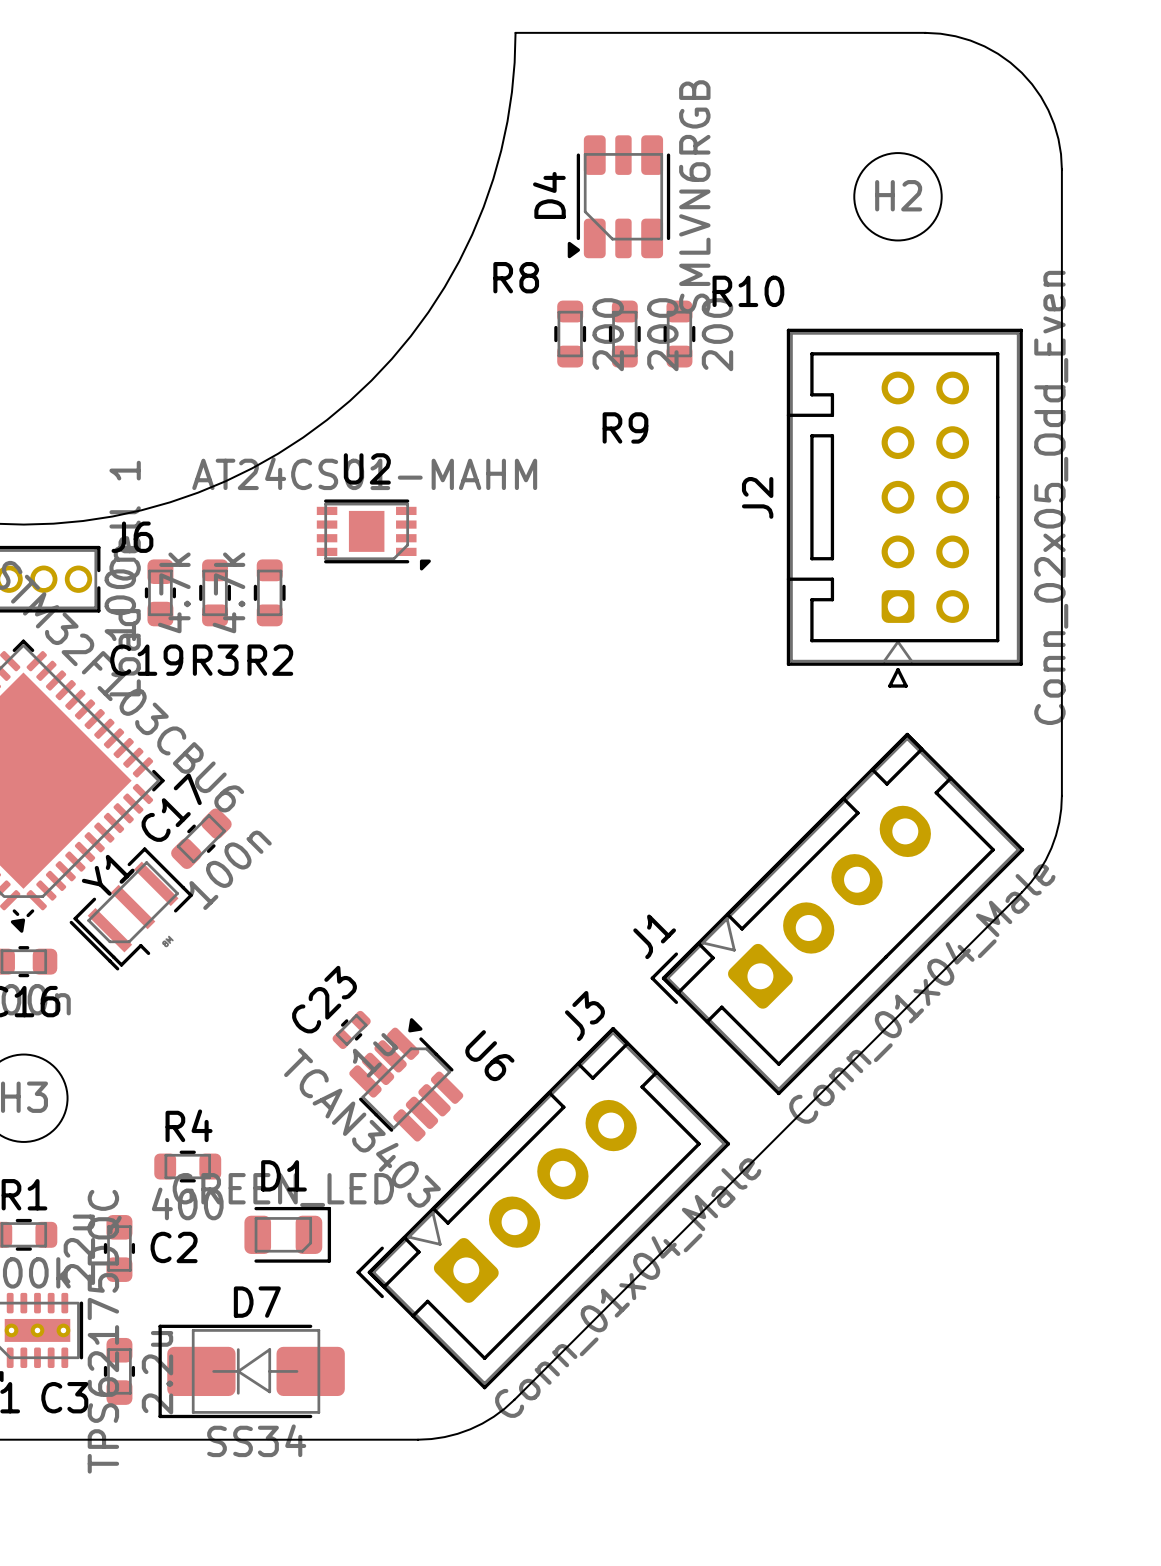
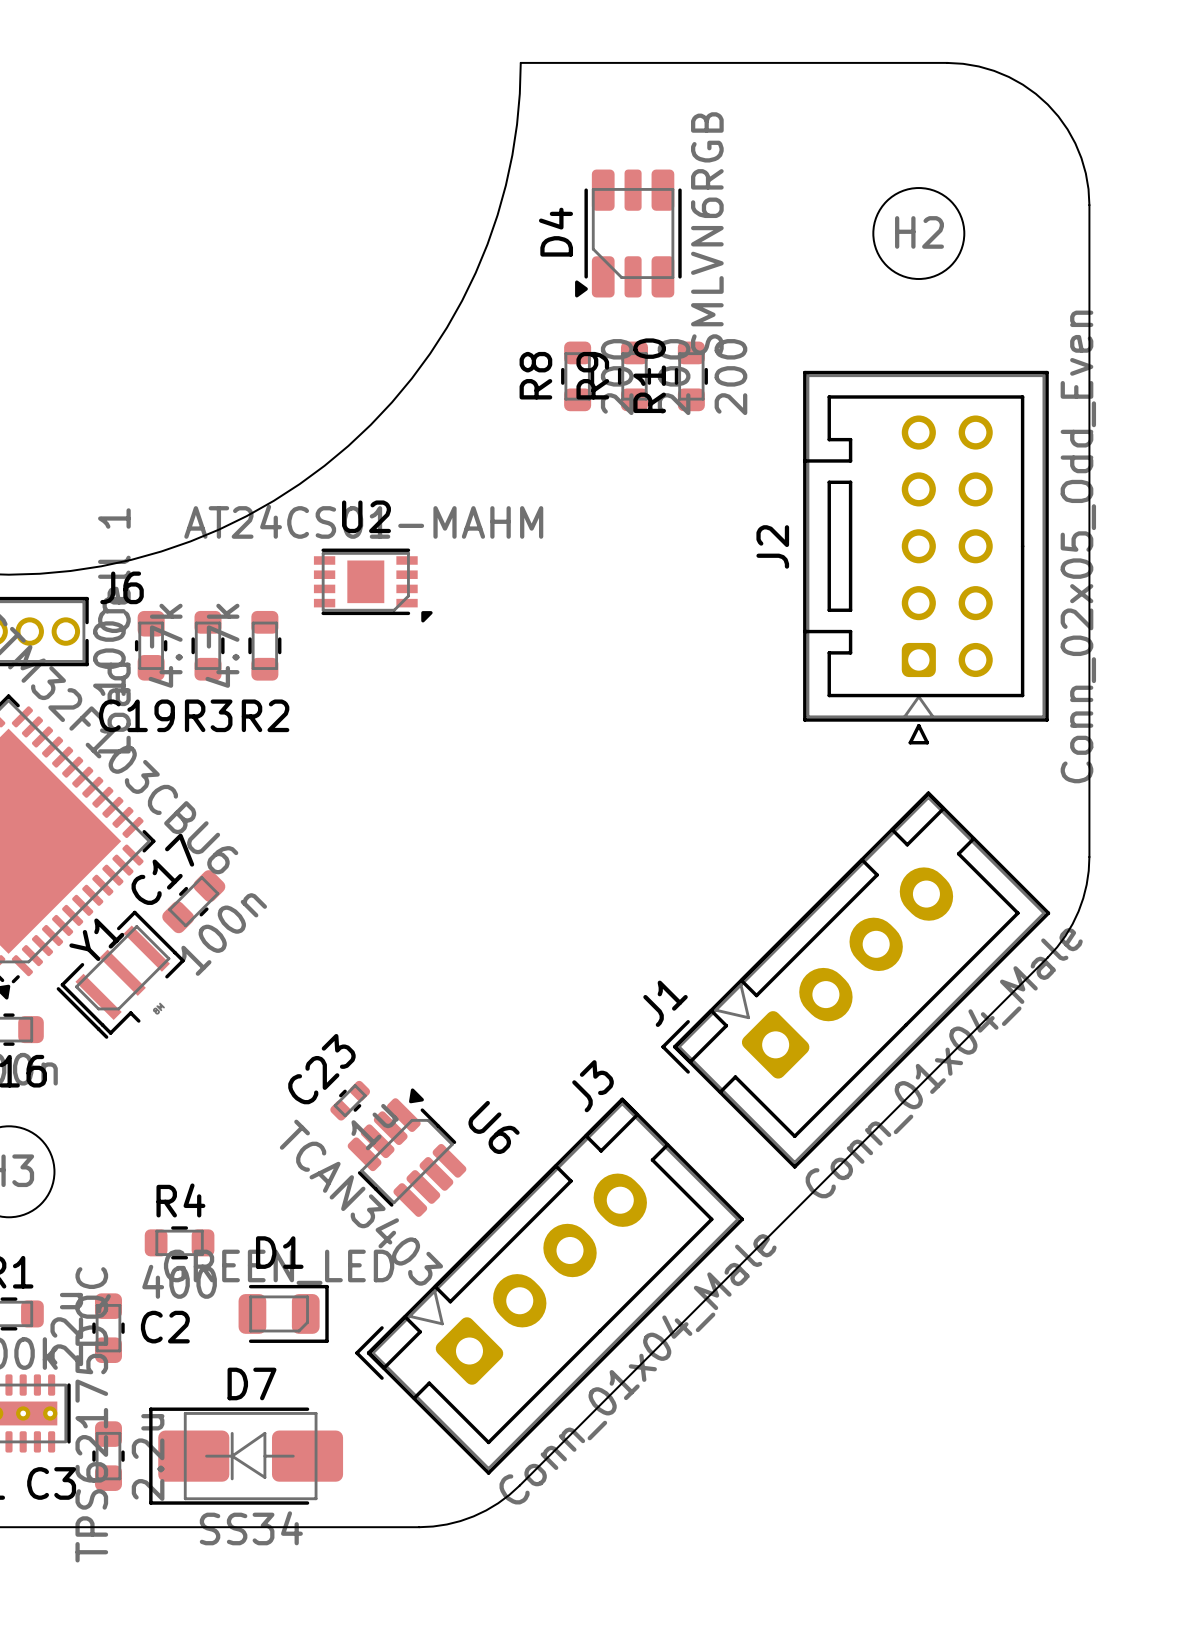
R8 name rotation: 0° (516, 277) -> 90° counterclockwise (535, 375)
R10 name rotation: 0° (748, 291) -> 90° counterclockwise (649, 375)
R10 name position: R10 (748, 291) -> R10 (649, 375)
R9 name rotation: 0° (625, 427) -> 90° counterclockwise (592, 375)
R9 name position: R9 (625, 427) -> R9 (592, 375)

